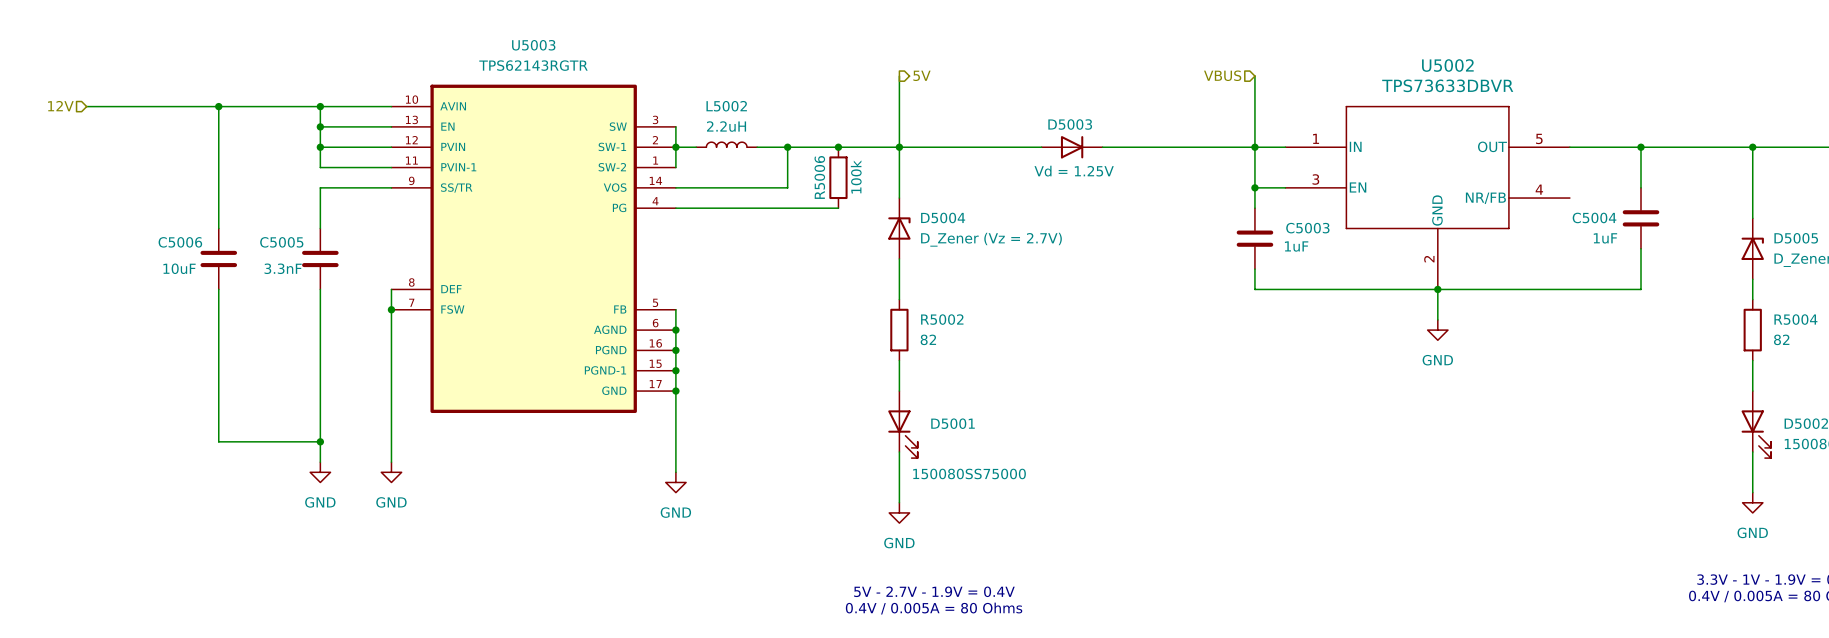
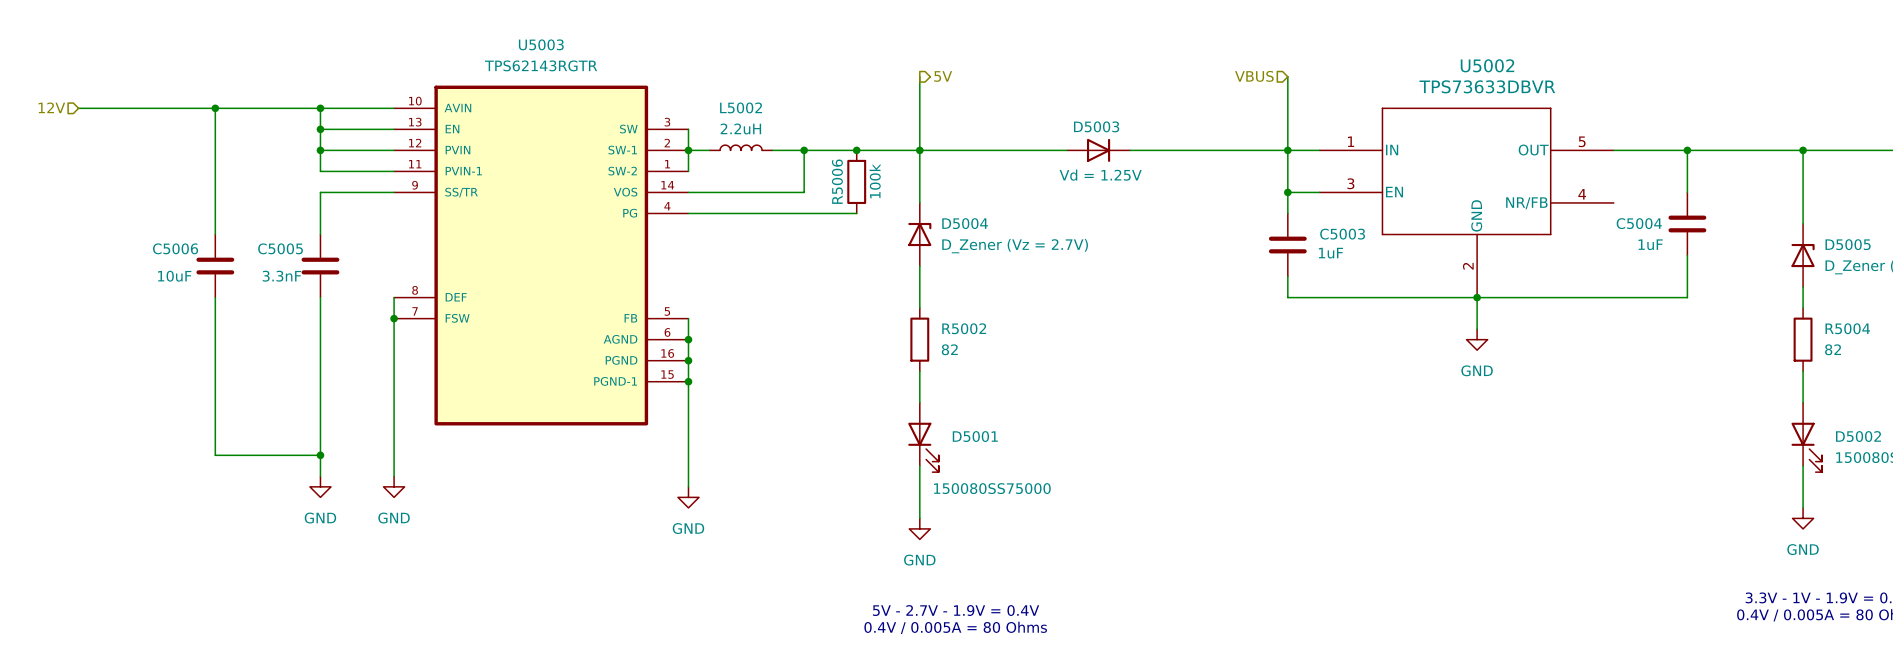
U5003 symbol: [391, 84, 676, 414] -> [394, 85, 689, 426]
junction: (675, 391) -> none

